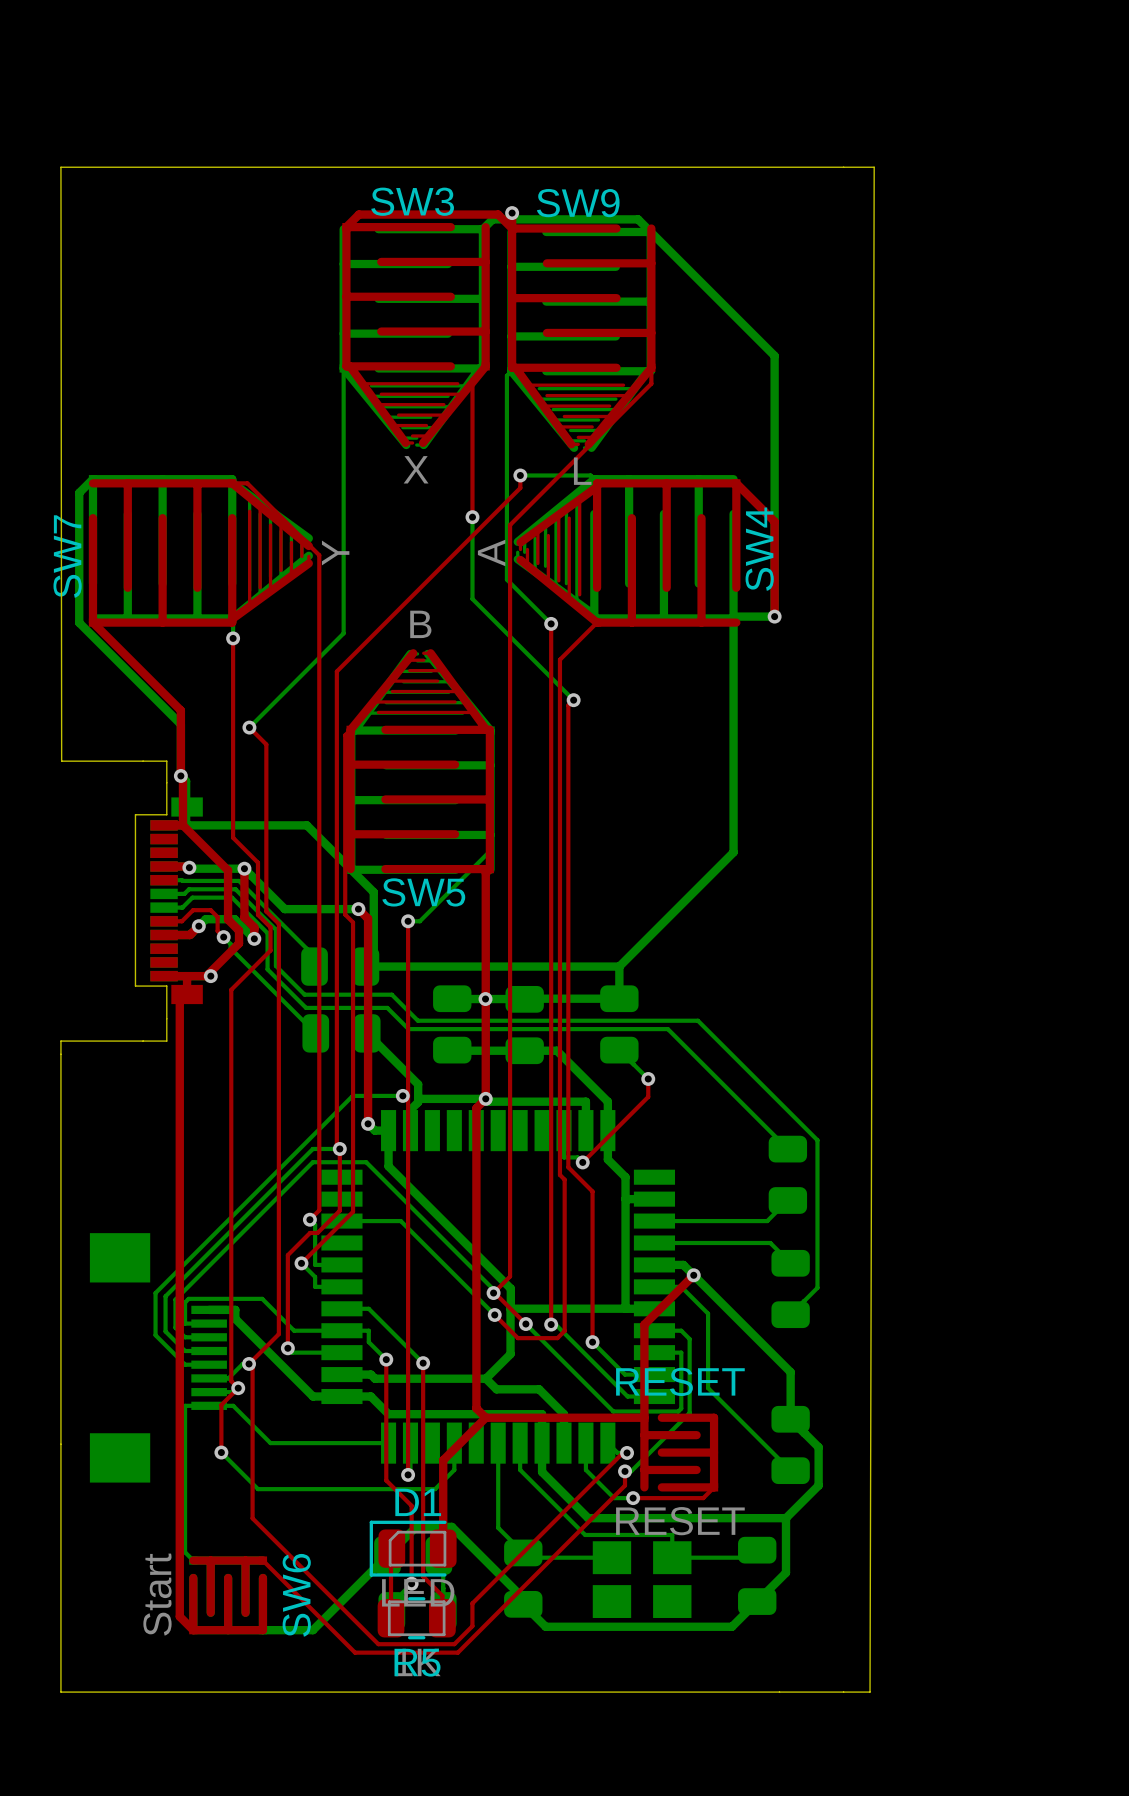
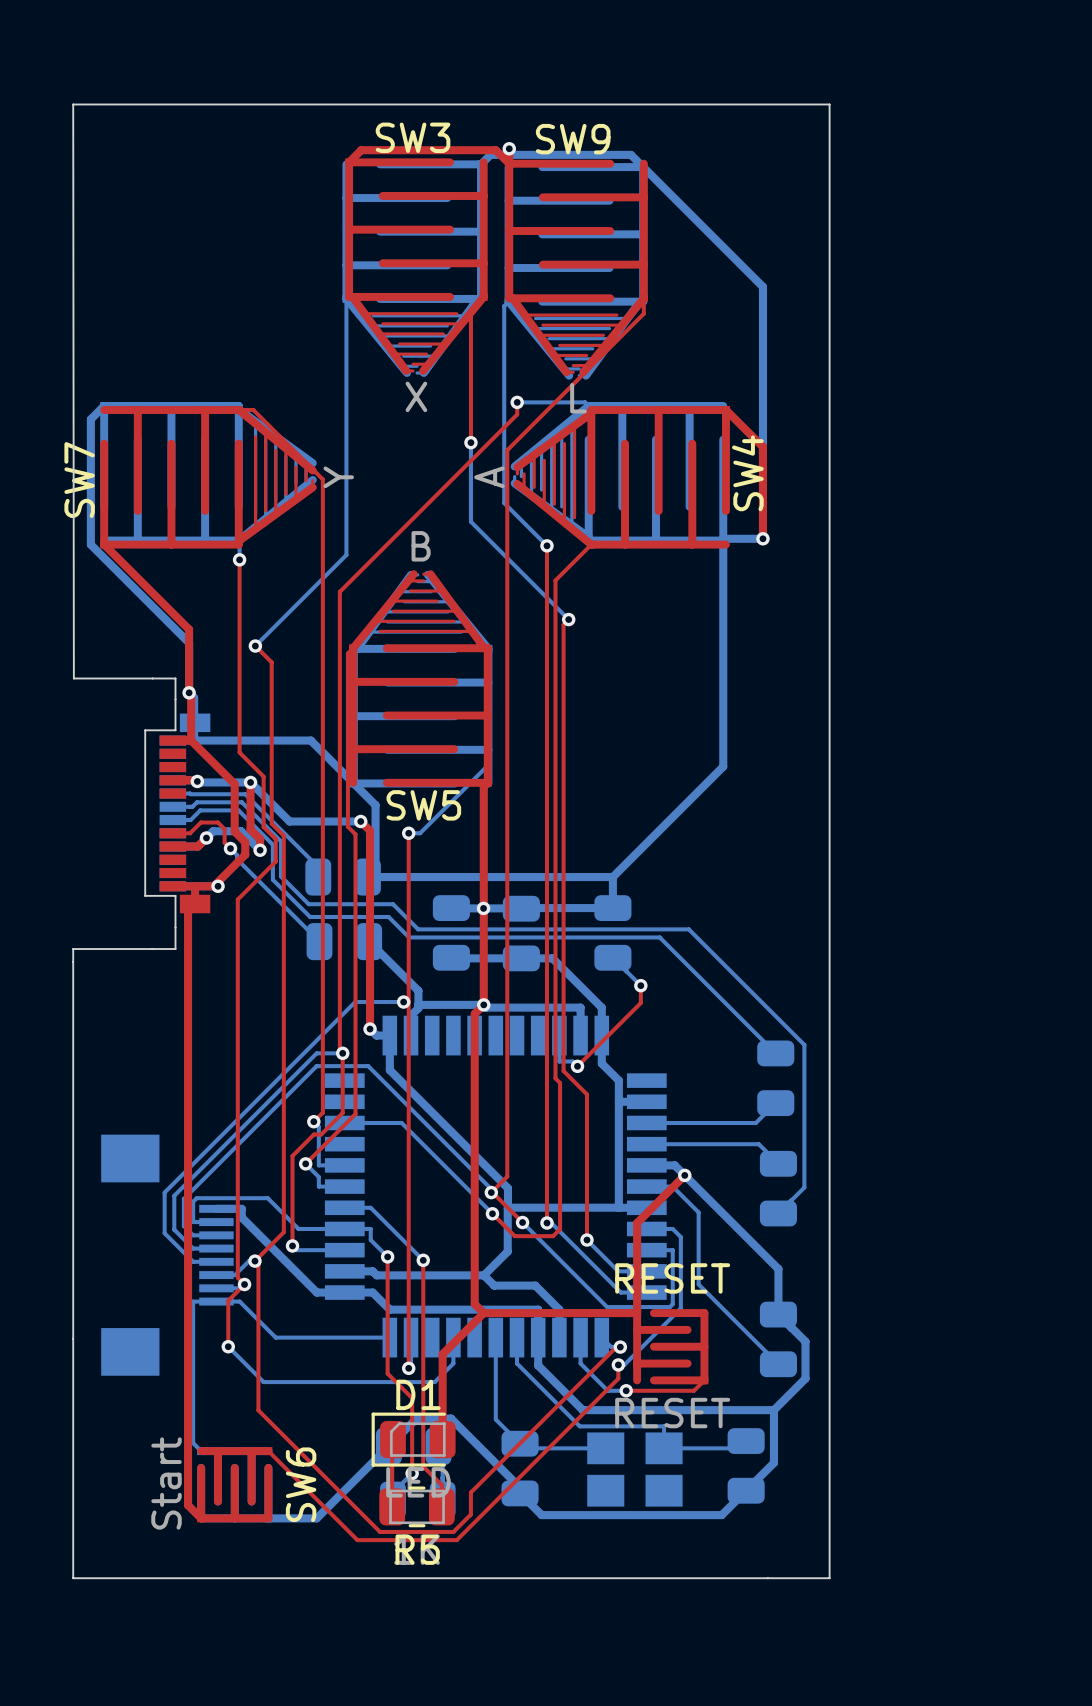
board edge: (843, 167) (874, 167) (870, 1692) (843, 1692) -> (829, 104) (829, 1578)

